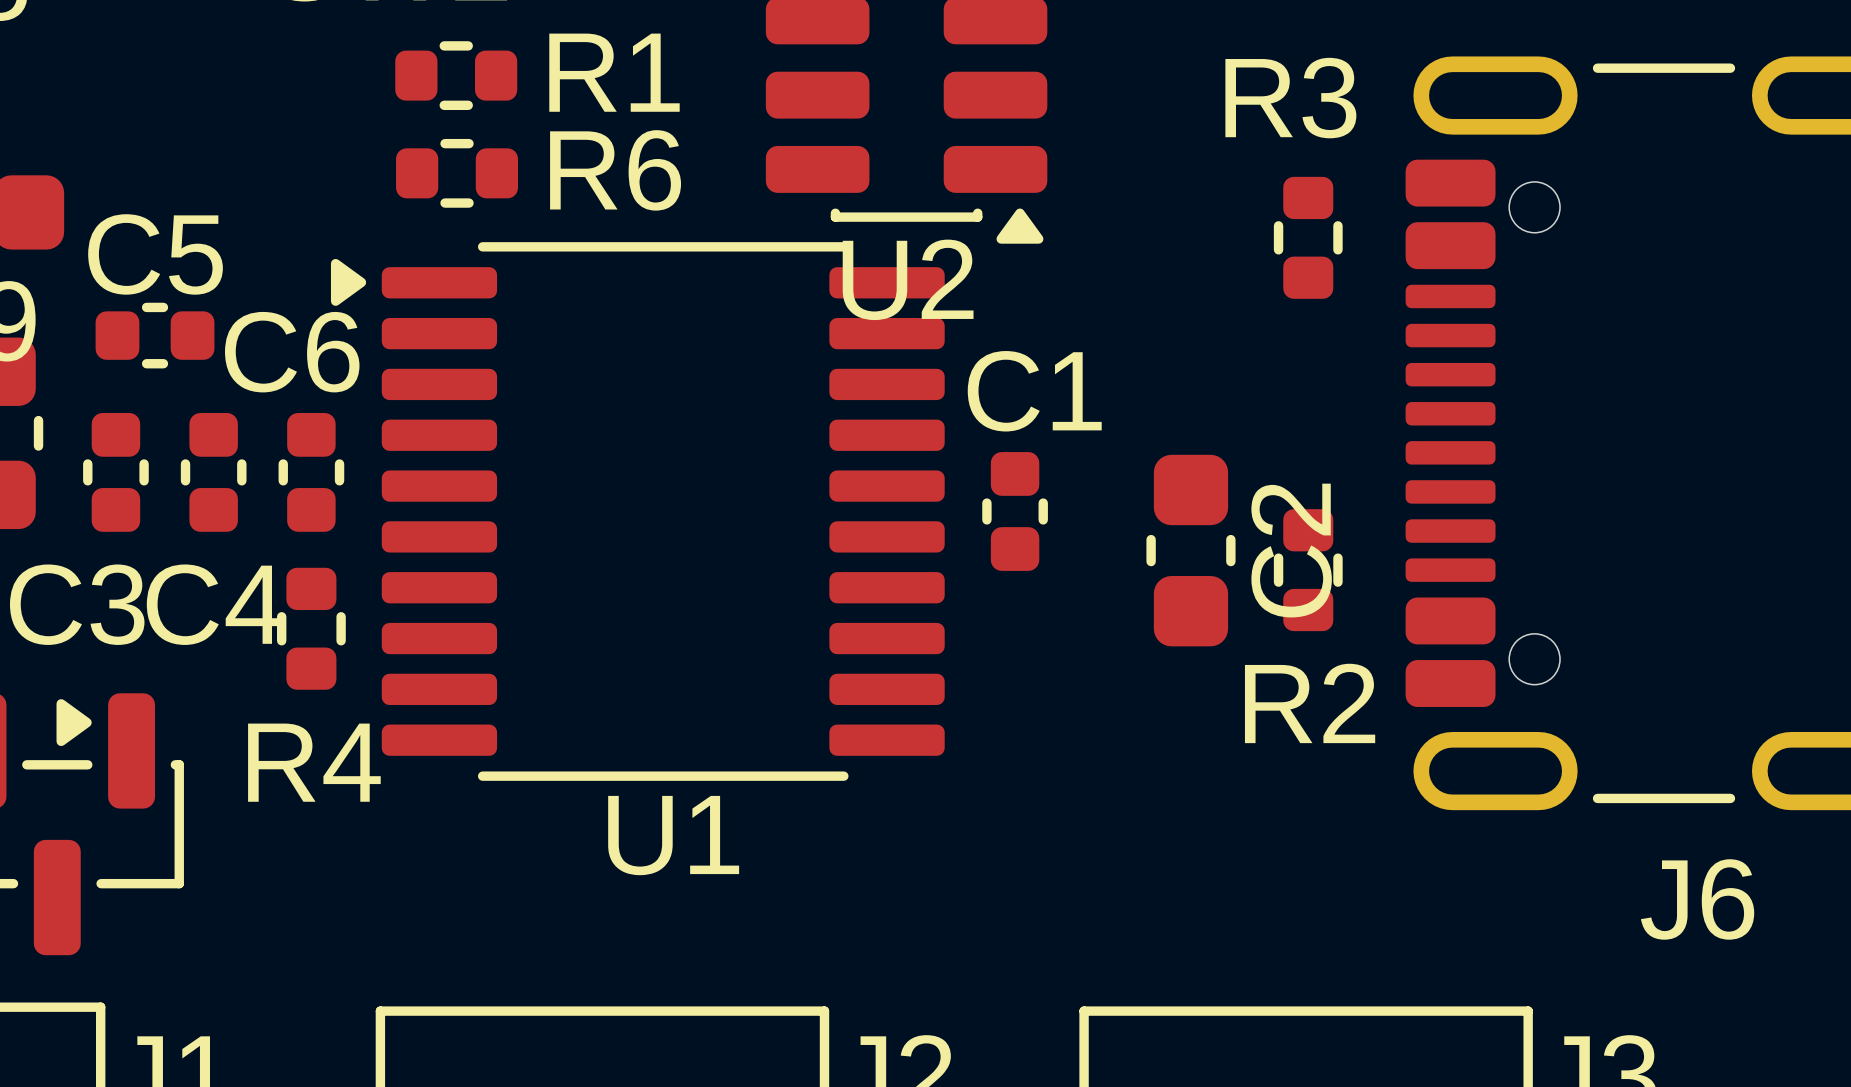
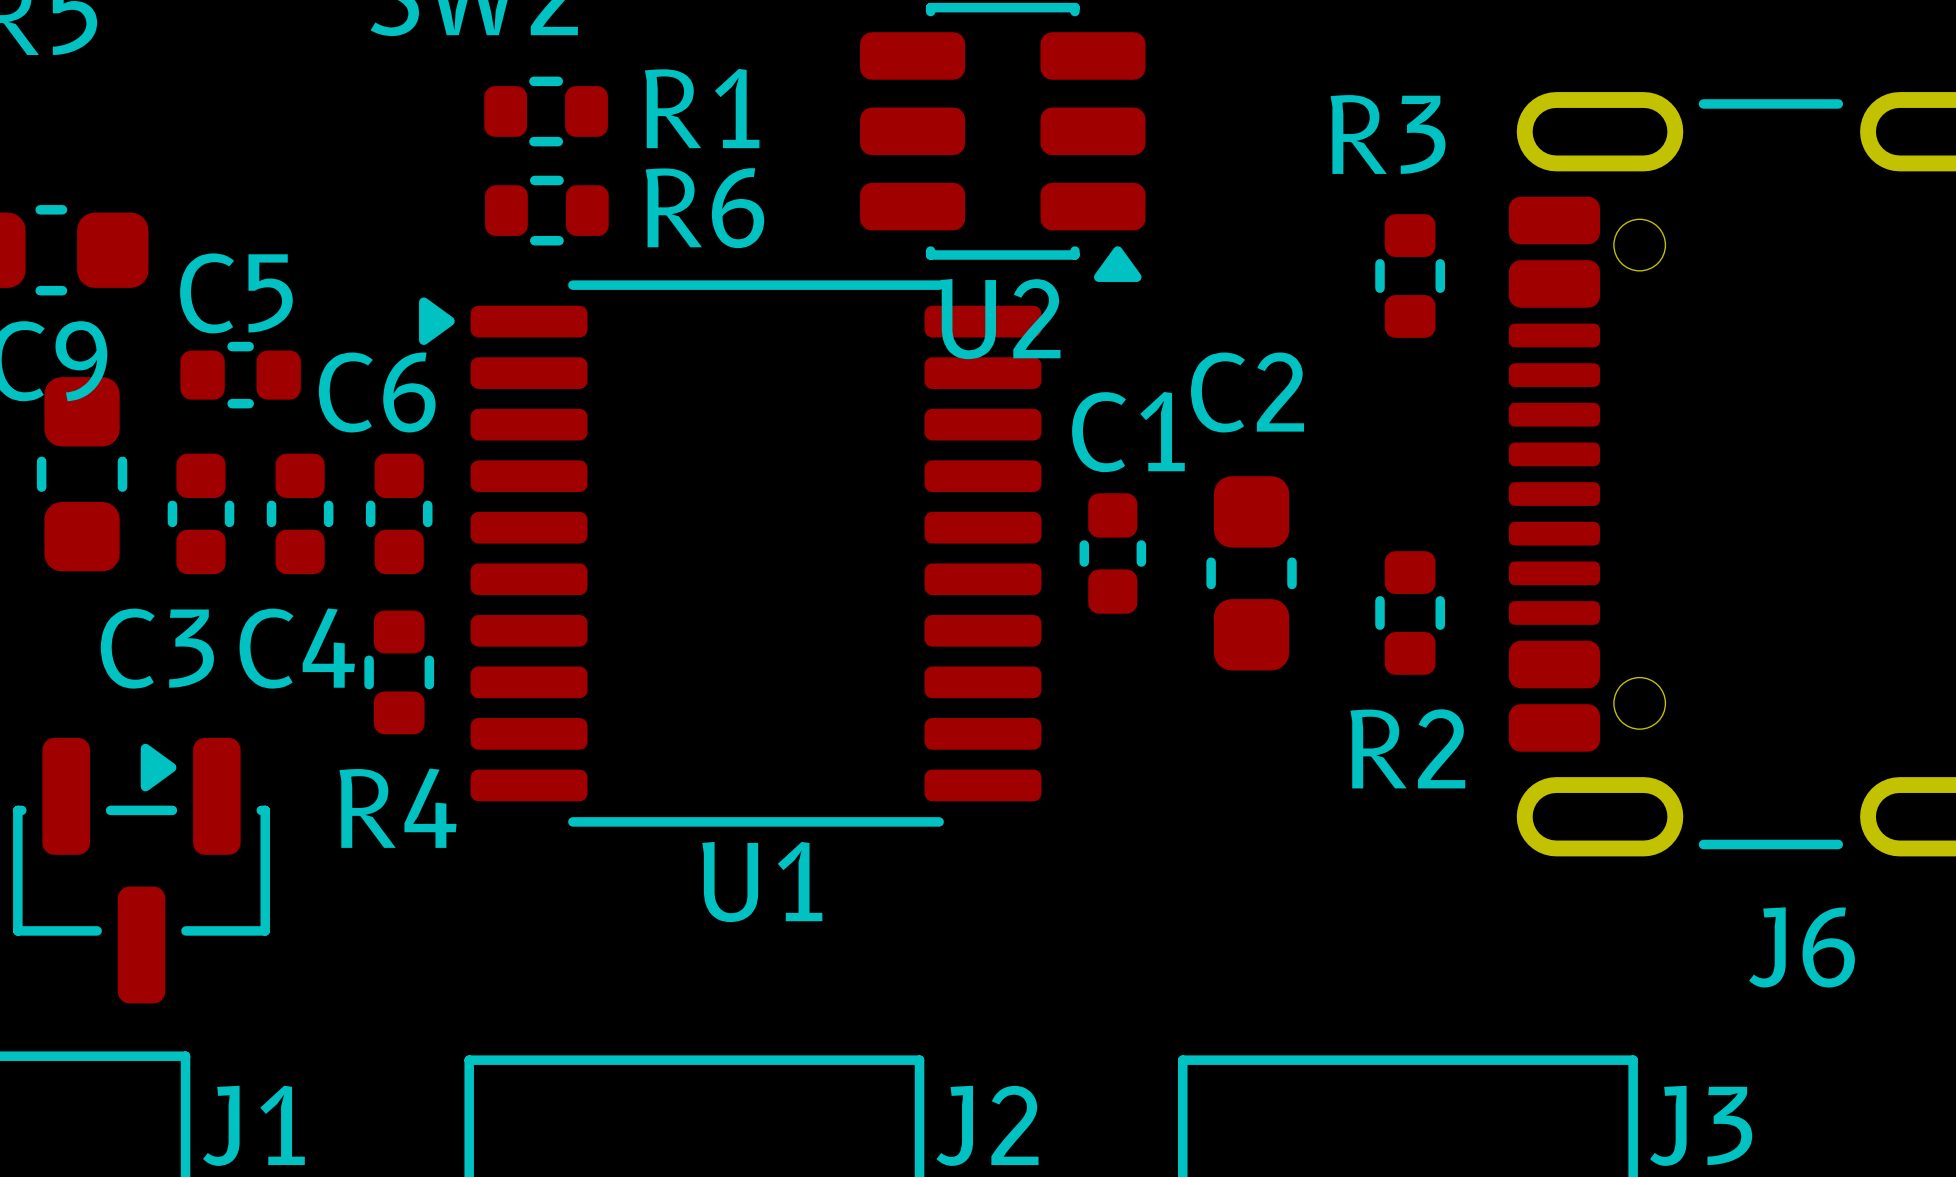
C2 position: (1190, 550) -> (1251, 573)
C2 name rotation: 0° (1291, 550) -> 90° clockwise (1247, 392)
C2 name position: C2 (1291, 550) -> C2 (1247, 392)

